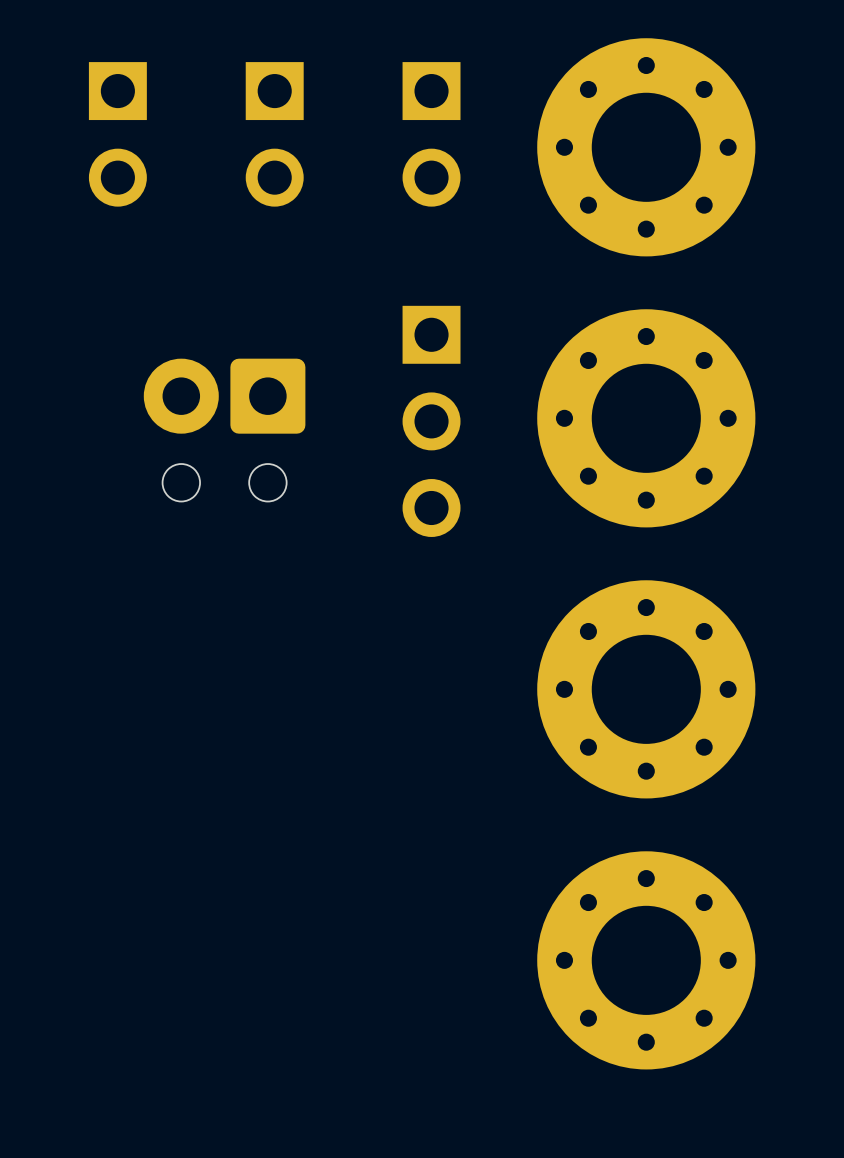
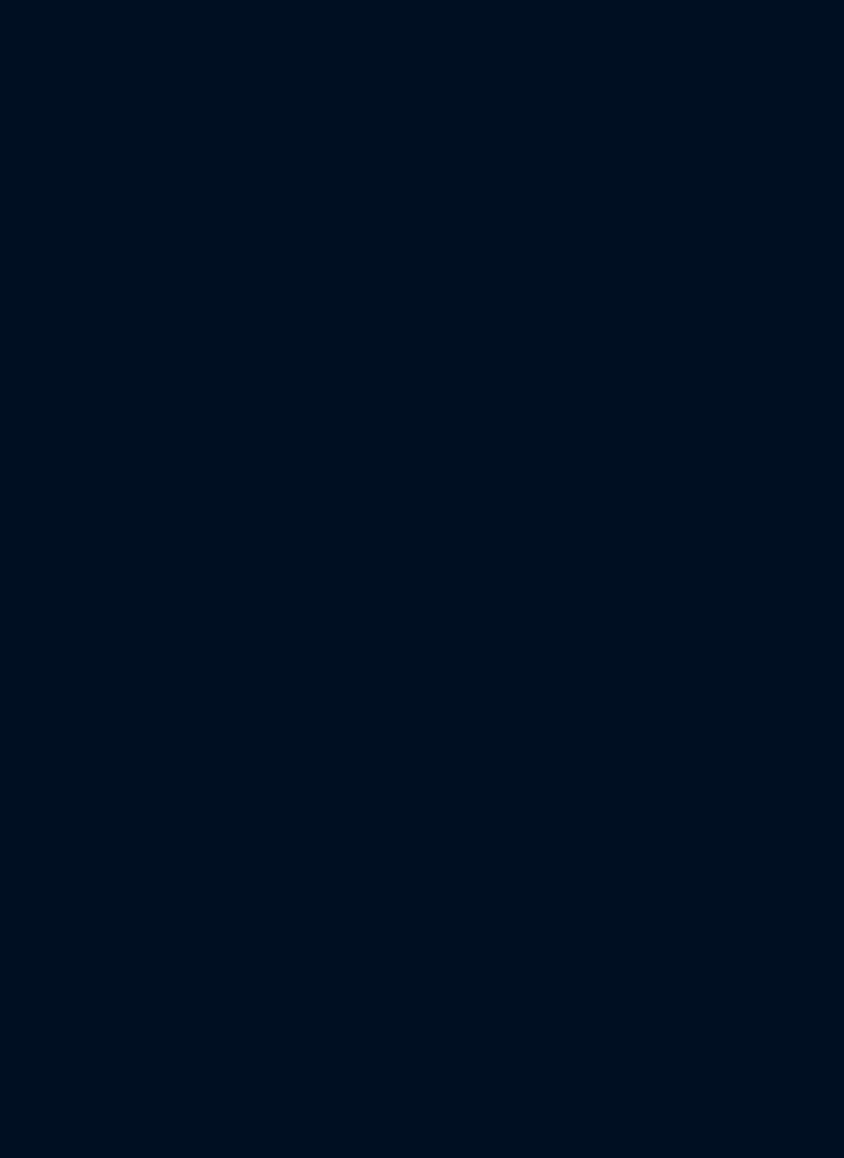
part: (117, 134) -> none
part: (274, 134) -> none
part: (431, 134) -> none
part: (646, 147) -> none
part: (646, 418) -> none
part: (431, 421) -> none
part: (224, 430) -> none
part: (646, 689) -> none
part: (646, 960) -> none

